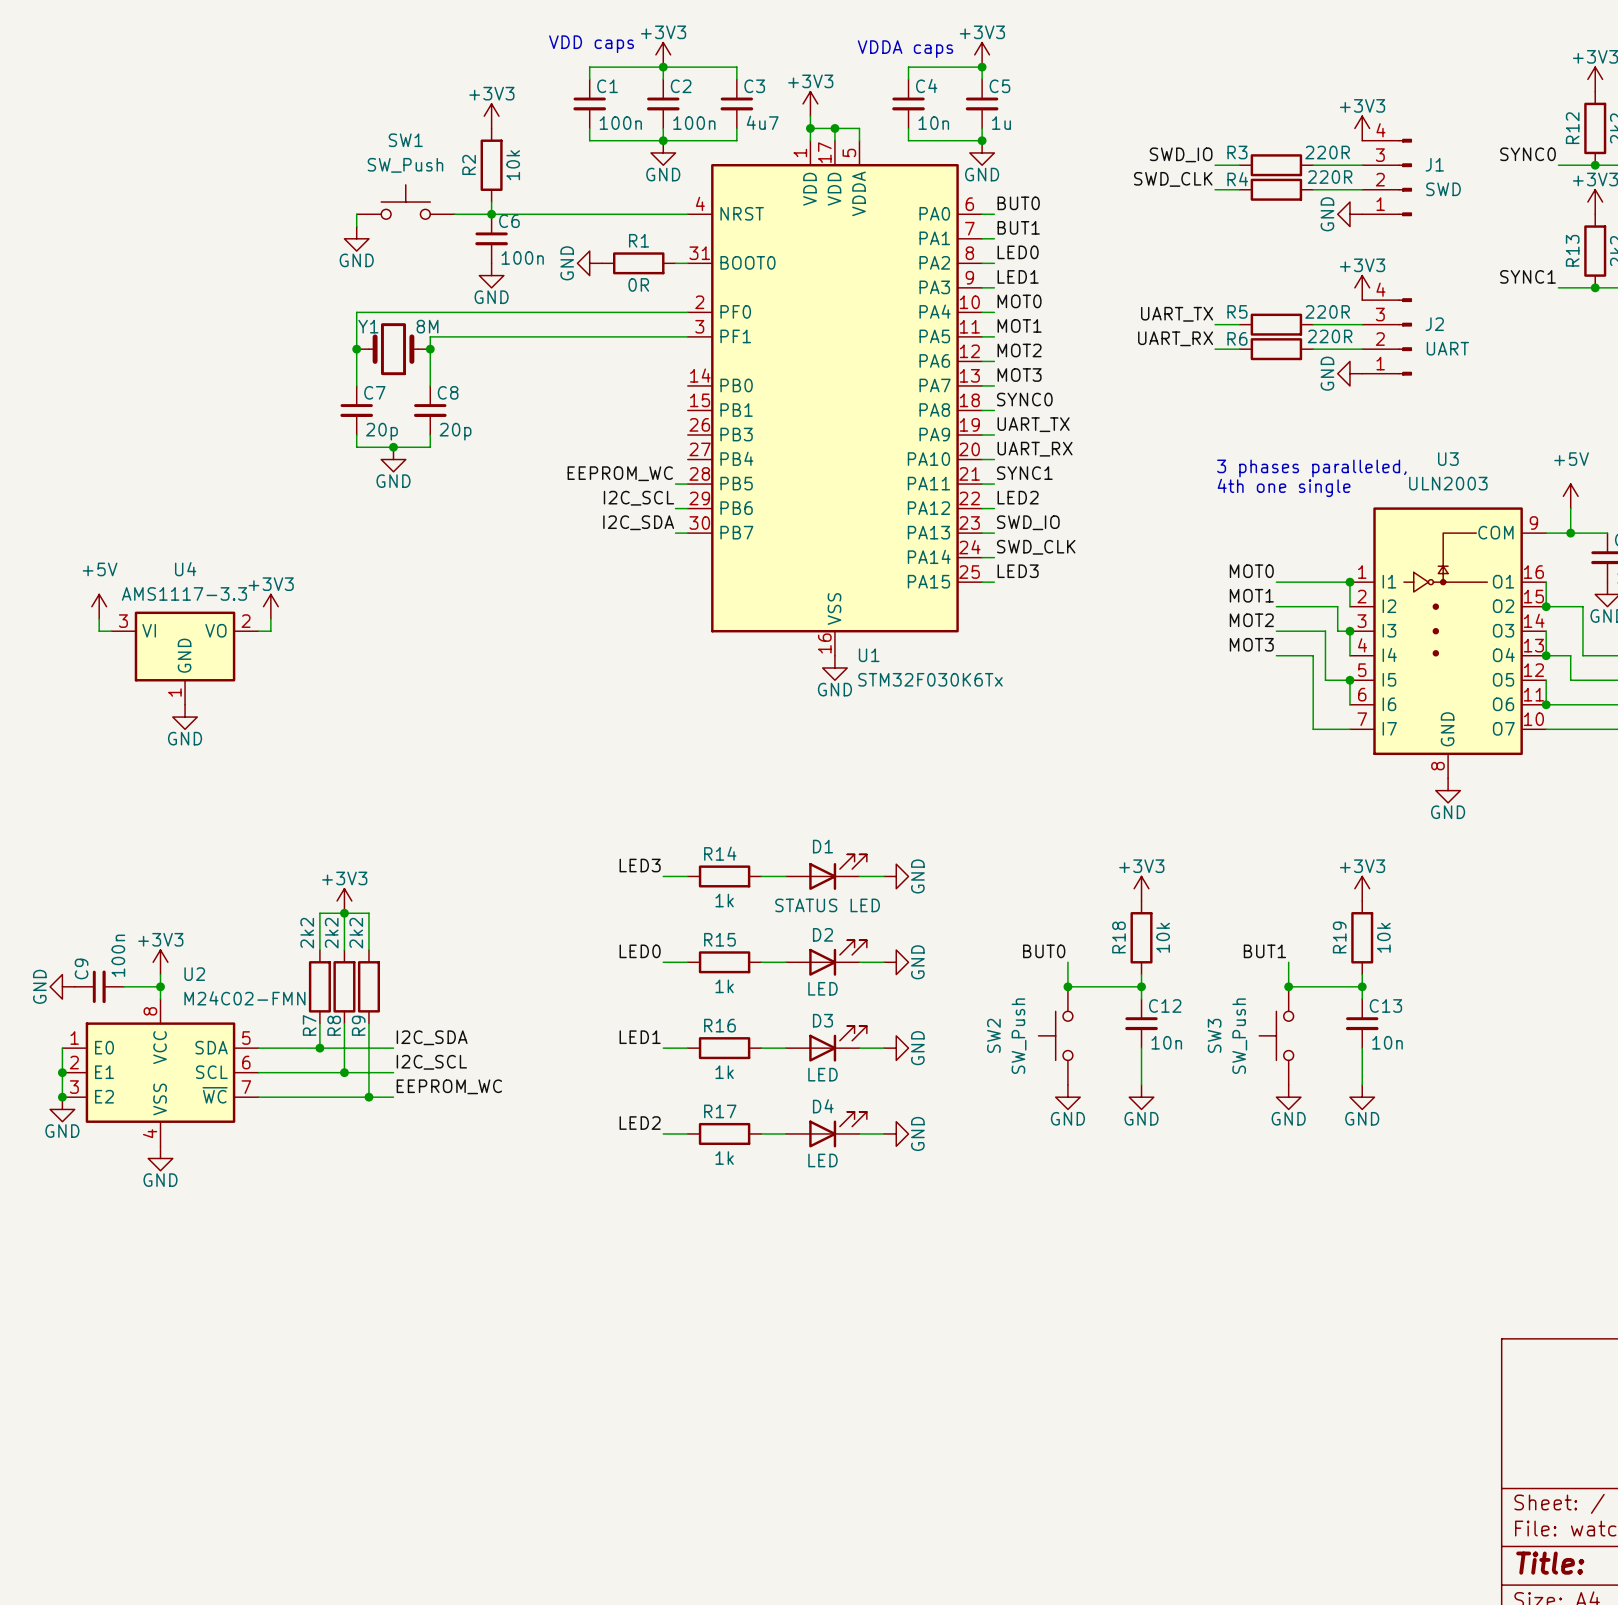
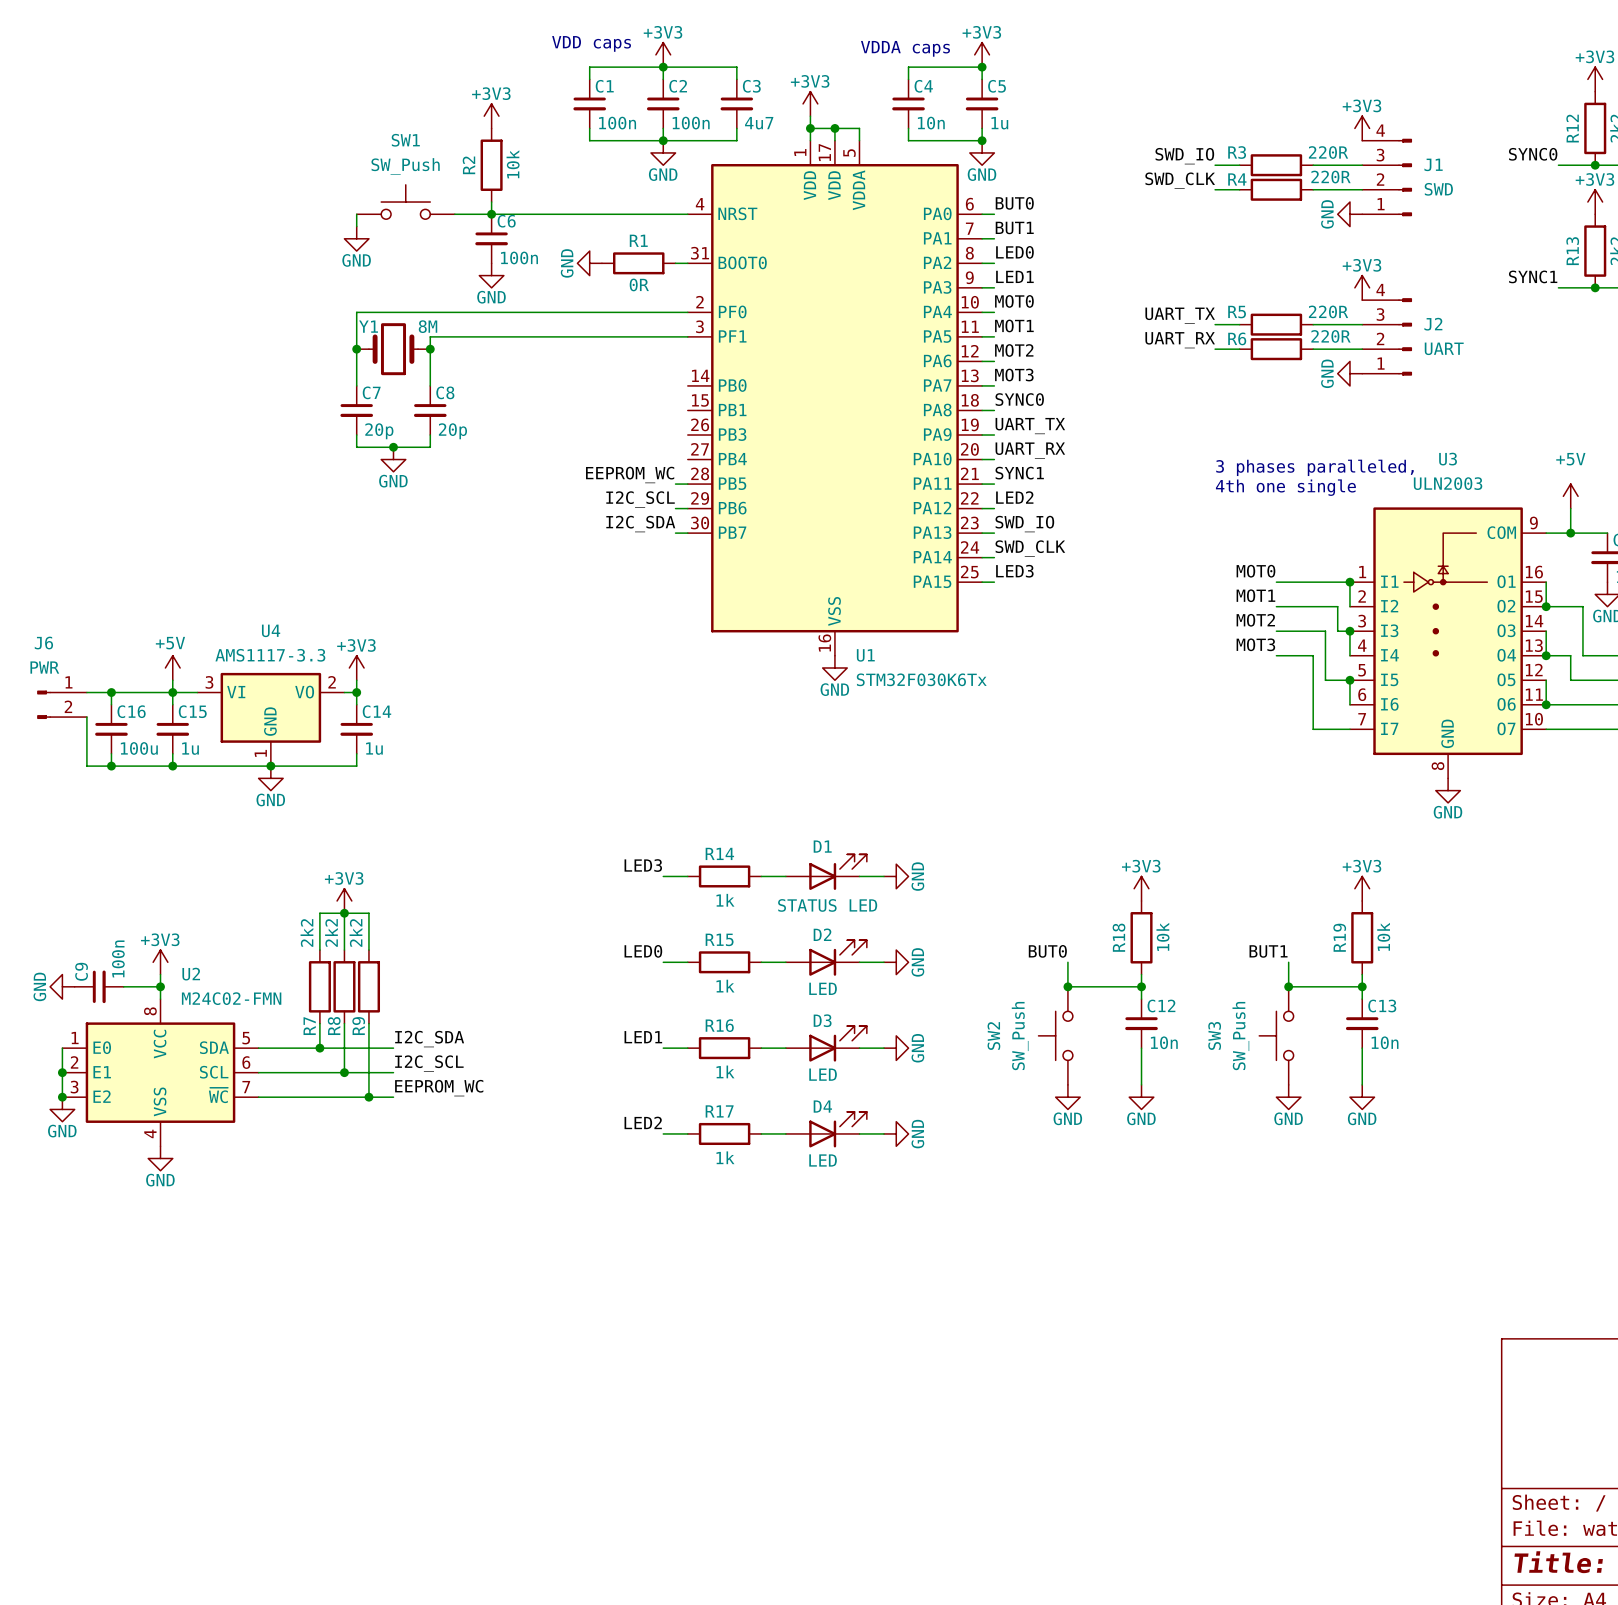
power symbol text position: +5V (100, 569) -> +5V (170, 643)
power symbol position: +5V (99, 606) -> +5V (172, 667)
power symbol position: +3V3 (270, 606) -> +3V3 (356, 667)
wire: (99, 618) (99, 631) (111, 631) -> none
wire: (270, 618) (270, 631) (258, 631) -> none
U4 position: (185, 658) -> (270, 719)
wire: none -> (172, 680) (172, 704)
wire: none -> (356, 680) (356, 704)
wire: none -> (86, 692) (197, 692)
wire: none -> (111, 692) (111, 704)
junction: none -> (111, 692)
junction: none -> (172, 692)
wire: none -> (344, 692) (356, 692)
junction: none -> (356, 692)
J6: none -> PWR (62, 704)
wire: none -> (86, 717) (86, 766) (356, 766) (356, 753)
power symbol position: GND (185, 717) -> GND (270, 778)
C16: none -> 100u (111, 729)
C15: none -> 1u (172, 729)
C14: none -> 1u (356, 729)
wire: none -> (111, 753) (111, 766)
wire: none -> (172, 753) (172, 766)
junction: none -> (111, 766)
junction: none -> (172, 766)
junction: none -> (270, 766)

